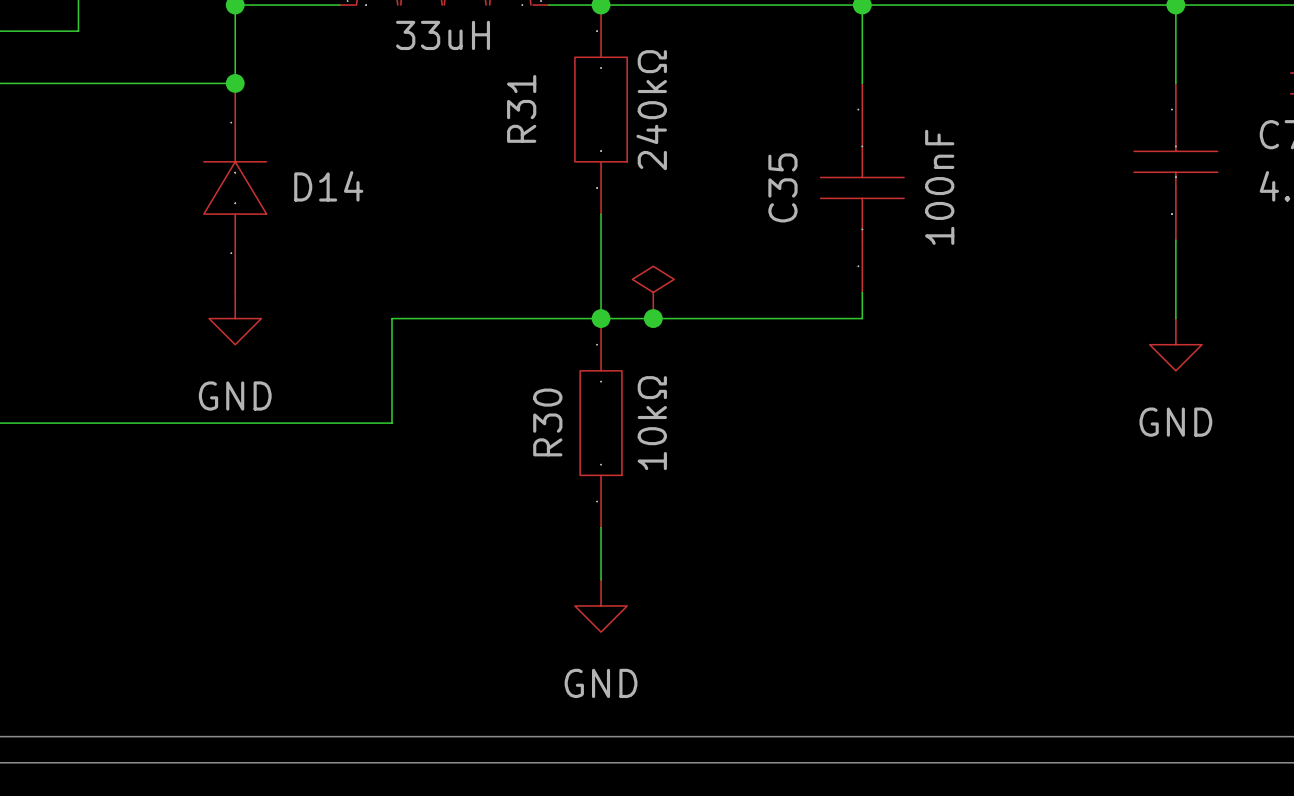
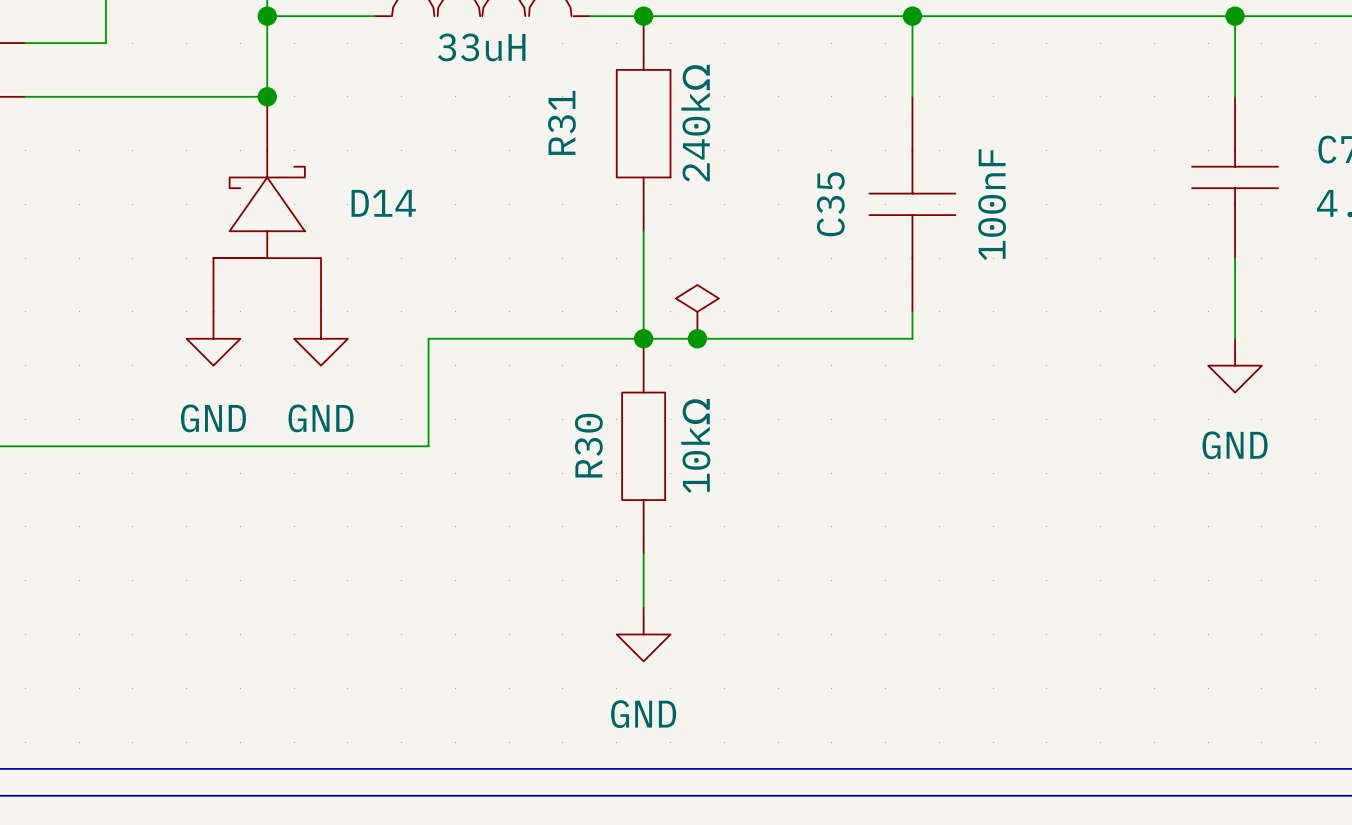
D14 symbol: [203, 83, 267, 293] -> [213, 96, 322, 312]
power symbol: none -> GND (213, 338)
power symbol: GND (235, 318) -> none
power symbol: none -> GND (321, 338)

